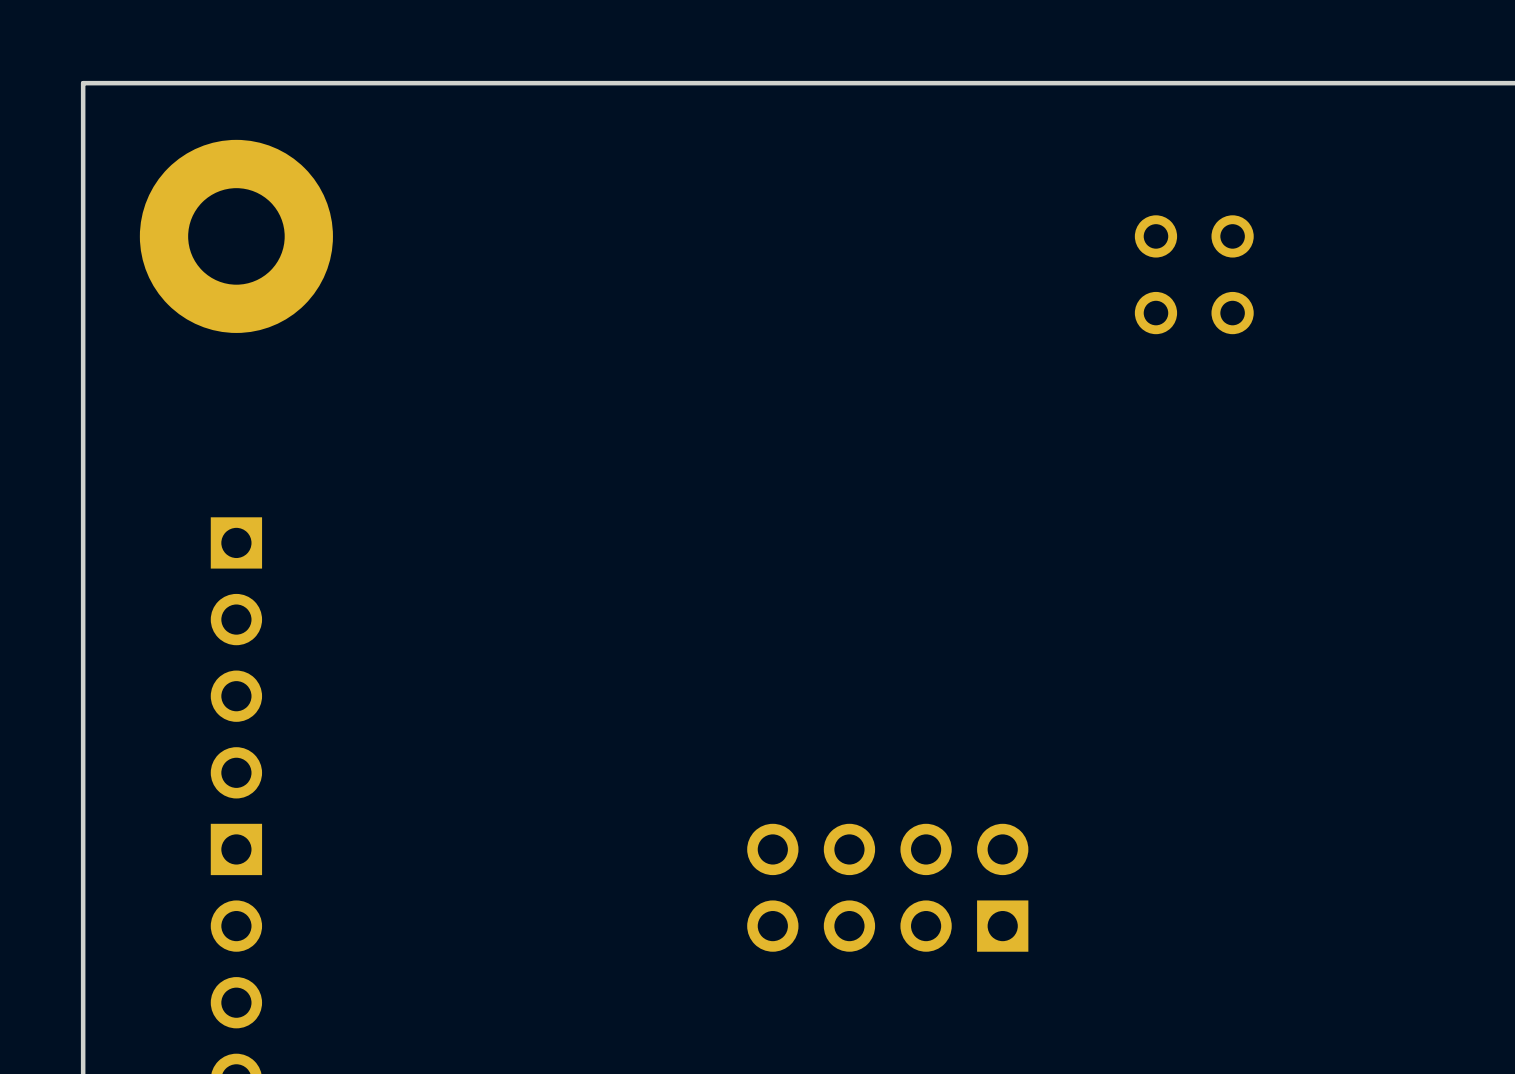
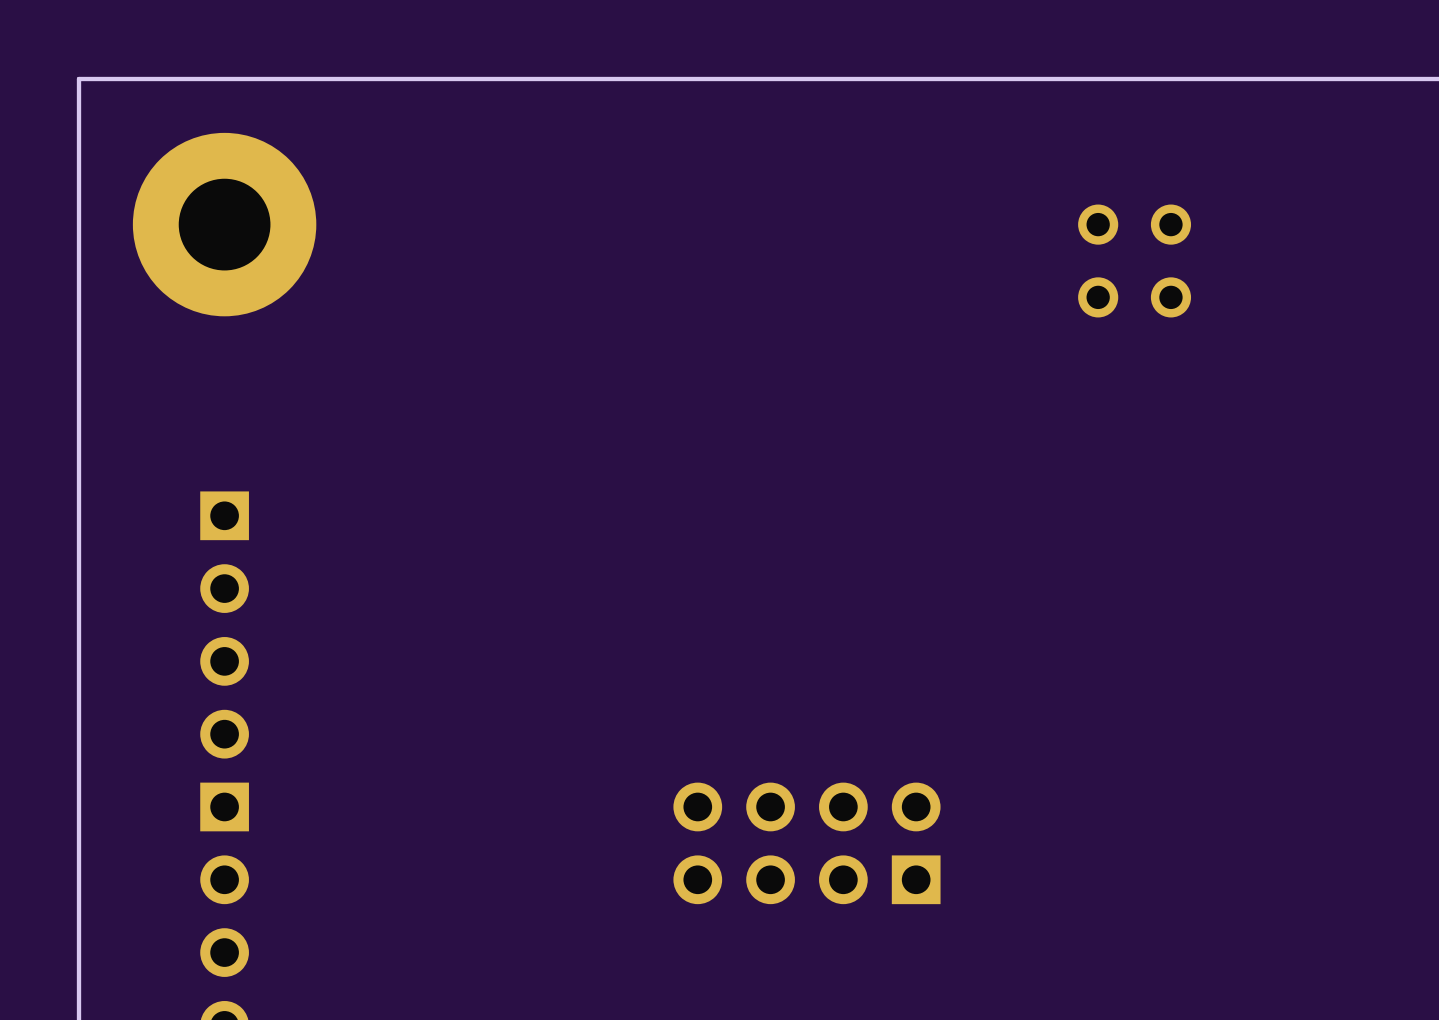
part position: (887, 887) -> (806, 843)

